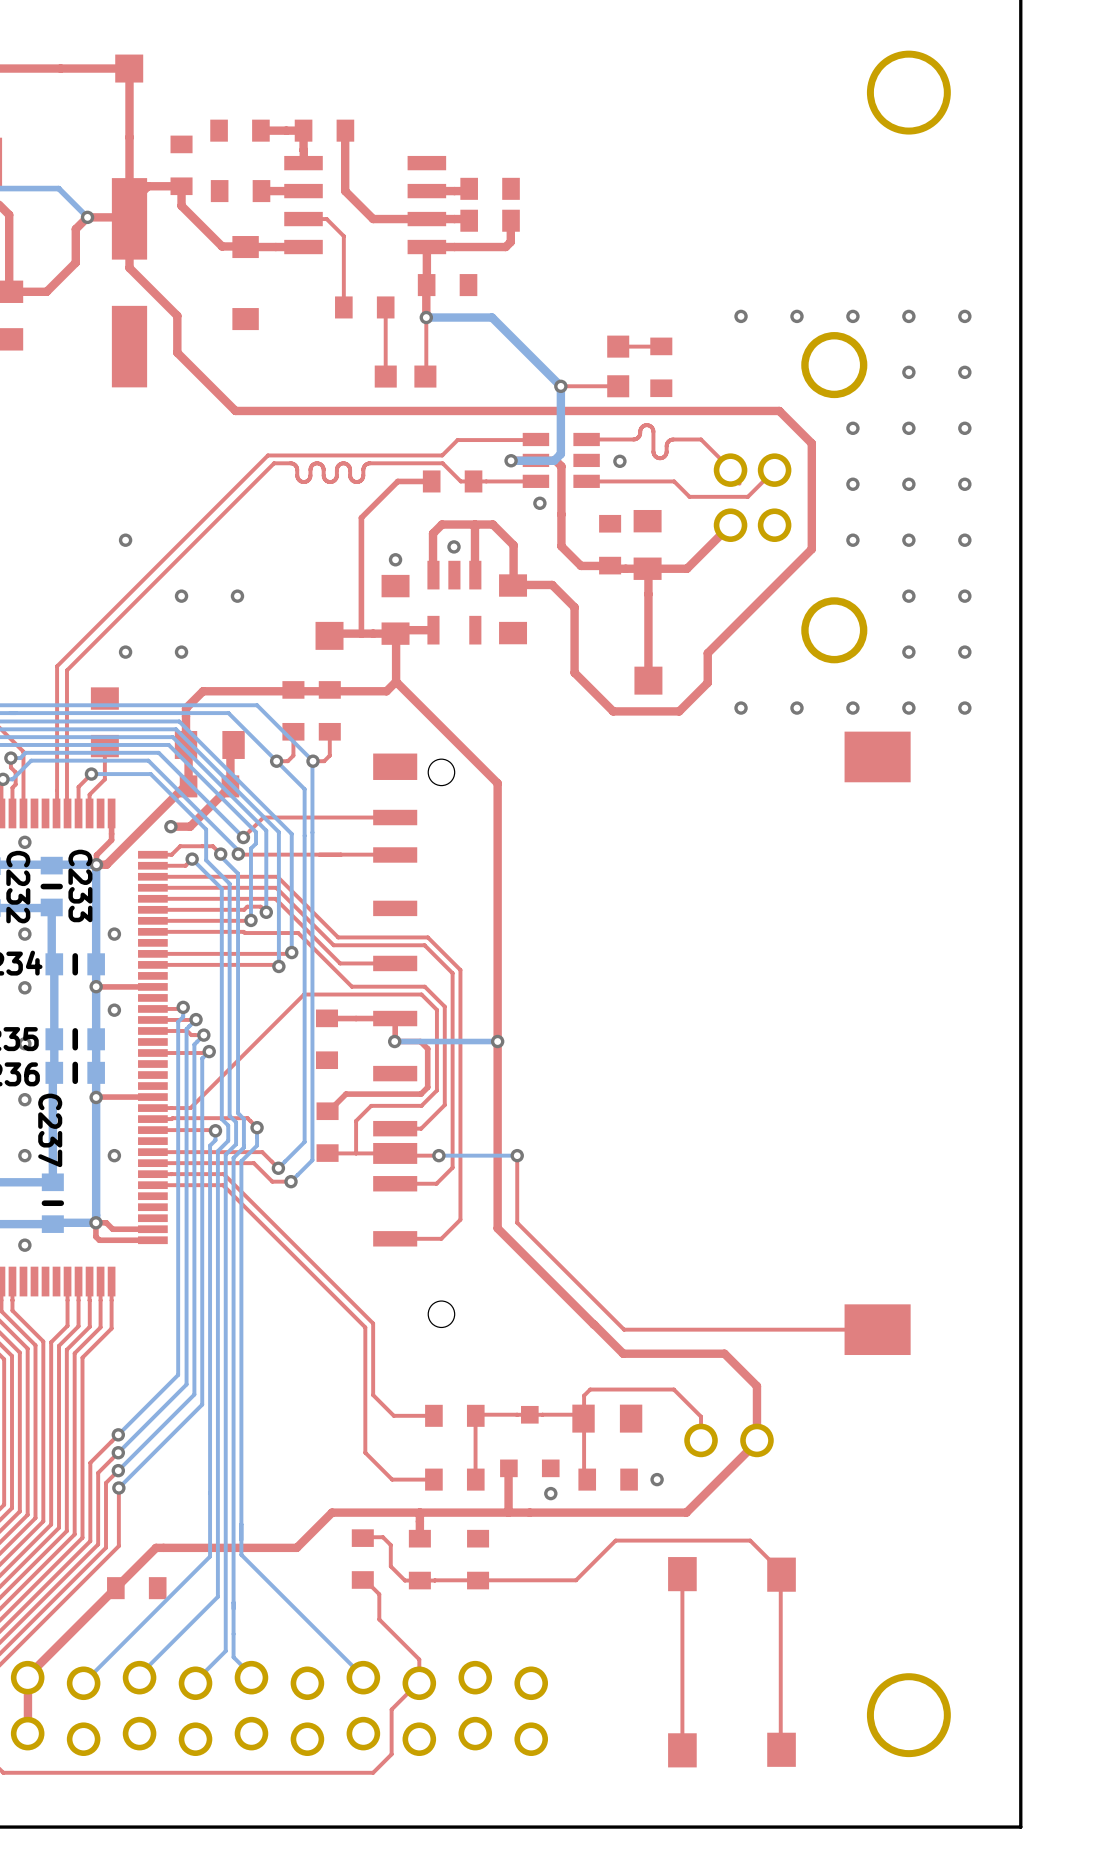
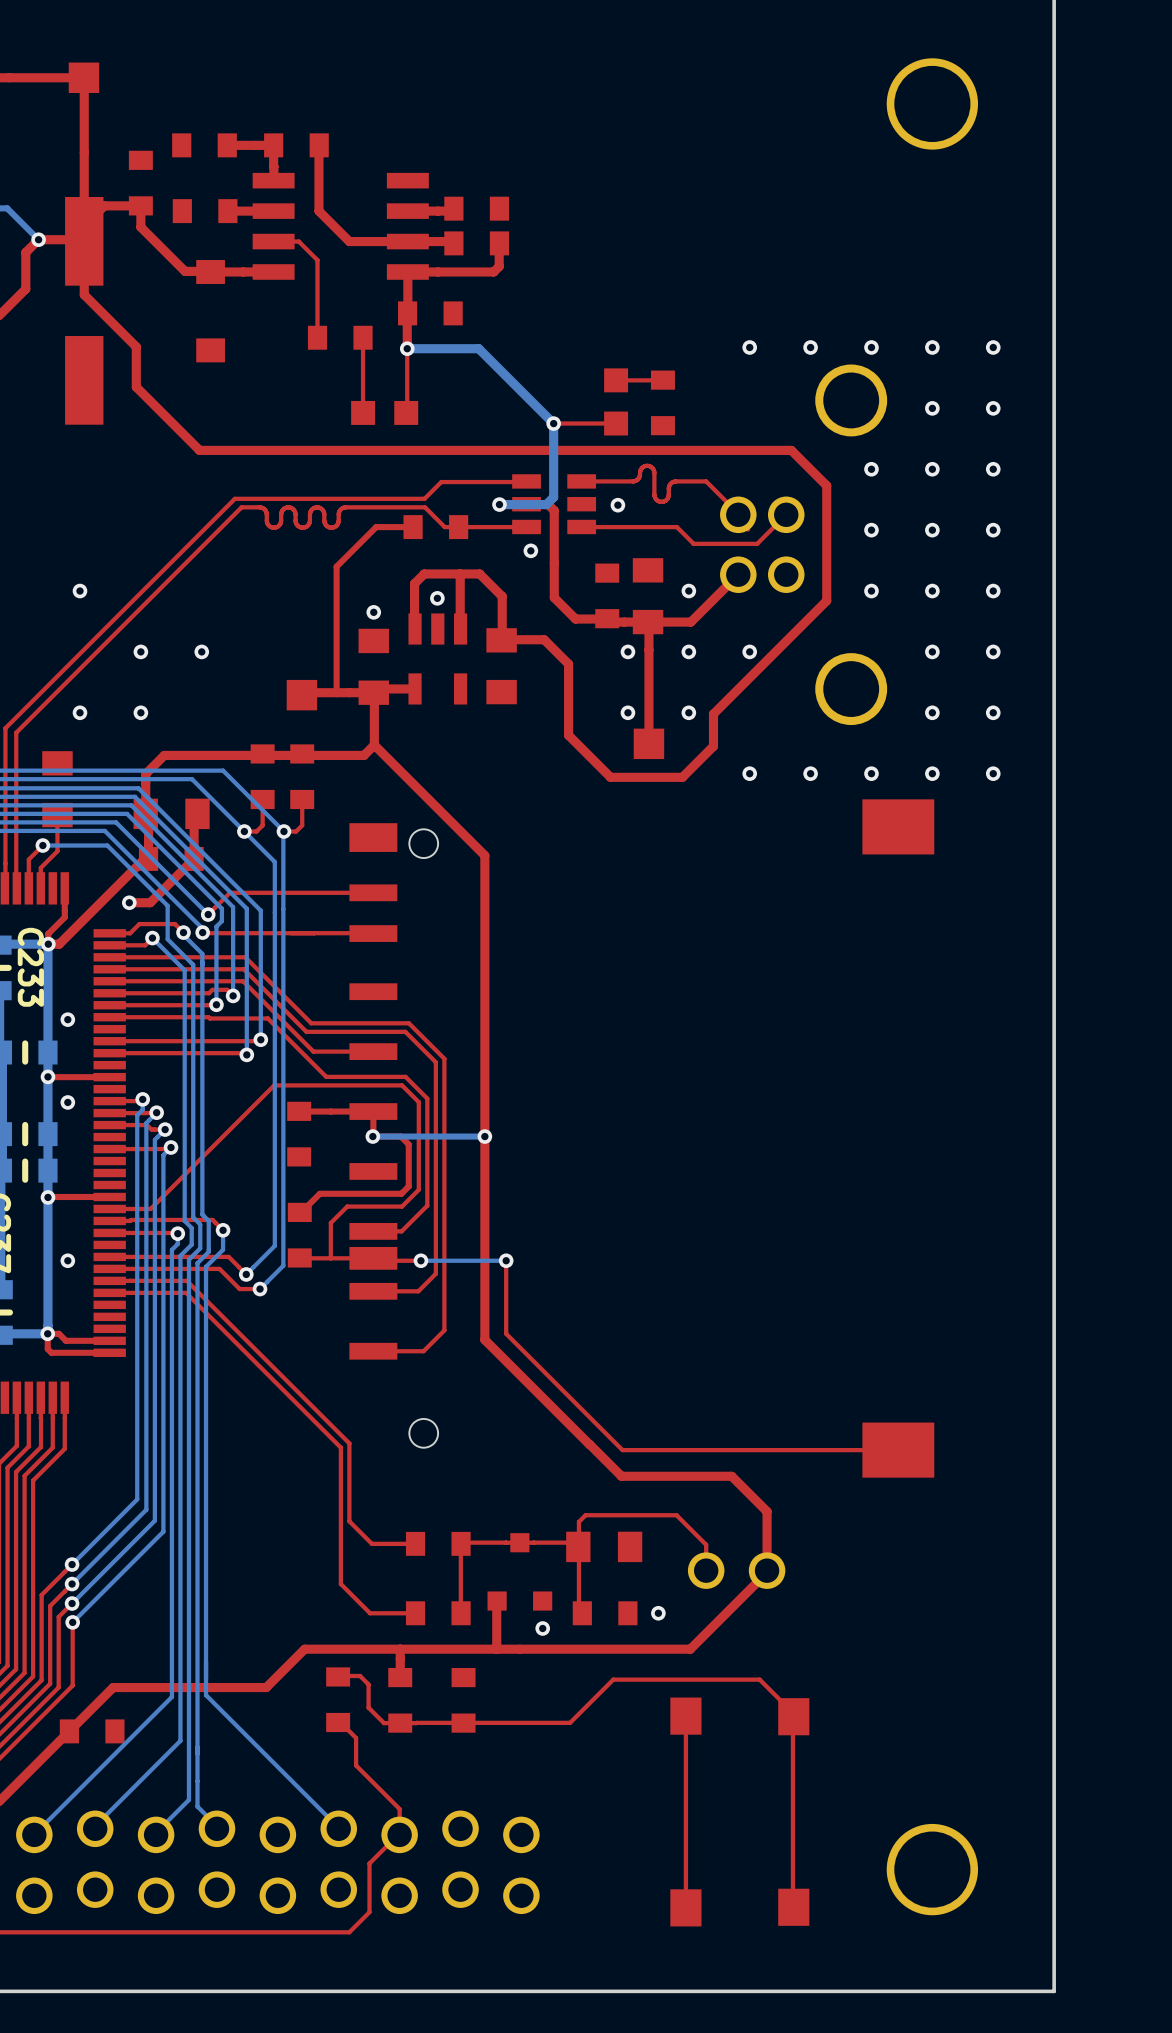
via: none -> (688, 591)
via: none -> (627, 651)
via: none -> (688, 651)
via: none -> (749, 651)
via: none -> (627, 712)
via: none -> (688, 712)

